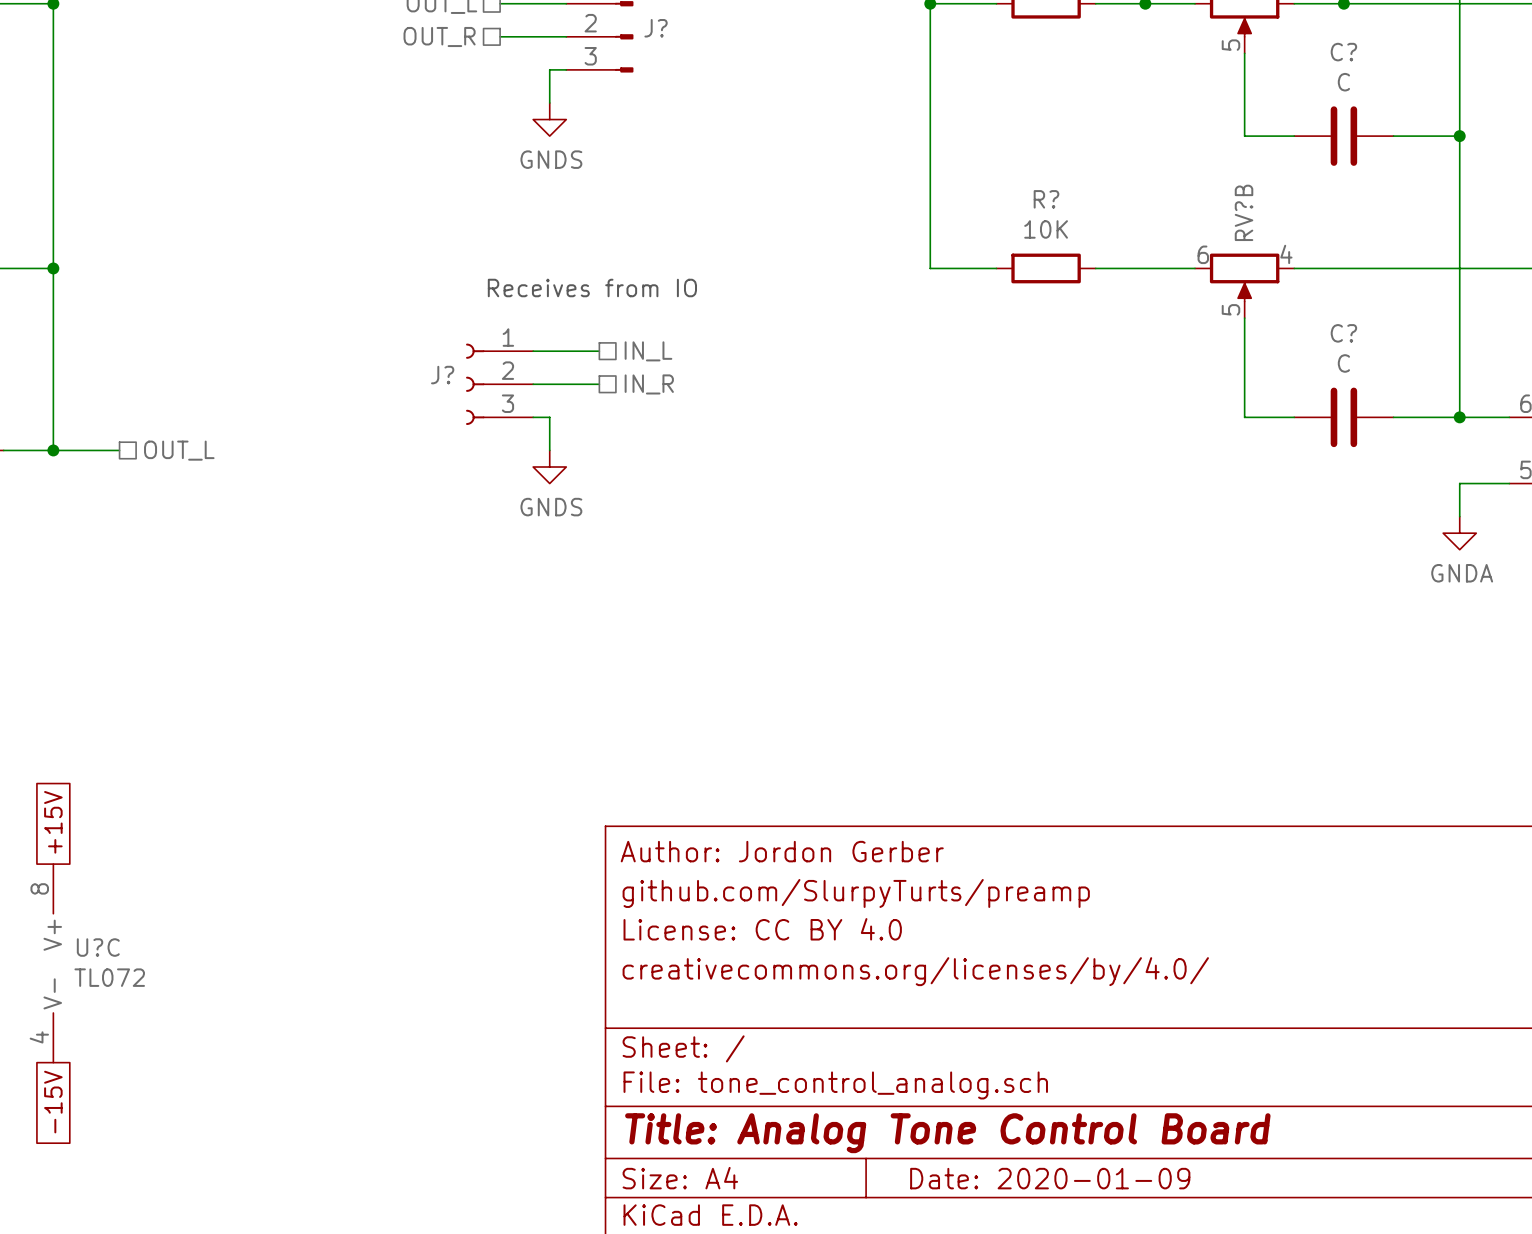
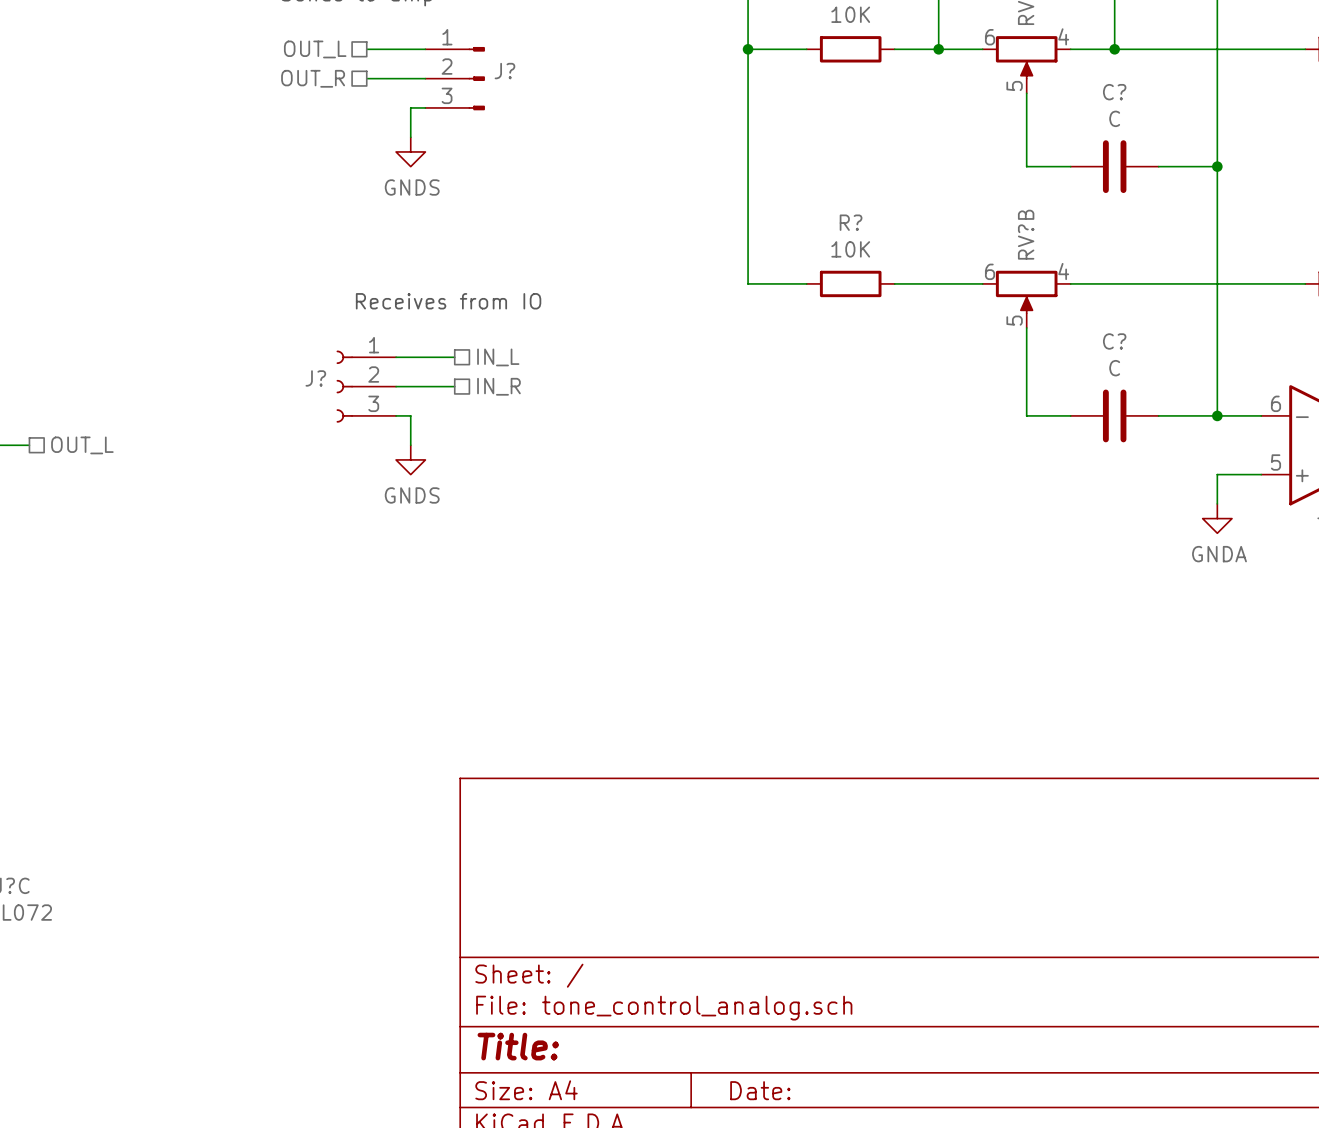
title block: Author: Jordon Gerber (782, 851) -> none
title block: github.com/SlurpyTurts/preamp (856, 893) -> none
title block: License: CC BY 4.0 (762, 929) -> none
title block: creativecommons.org/licenses/by/4.0/ (915, 971) -> none
title block: Title: Analog Tone Control Board (947, 1133) -> Title: (518, 1046)
title block: Date: 2020-01-09 (1050, 1178) -> Date: (760, 1090)

